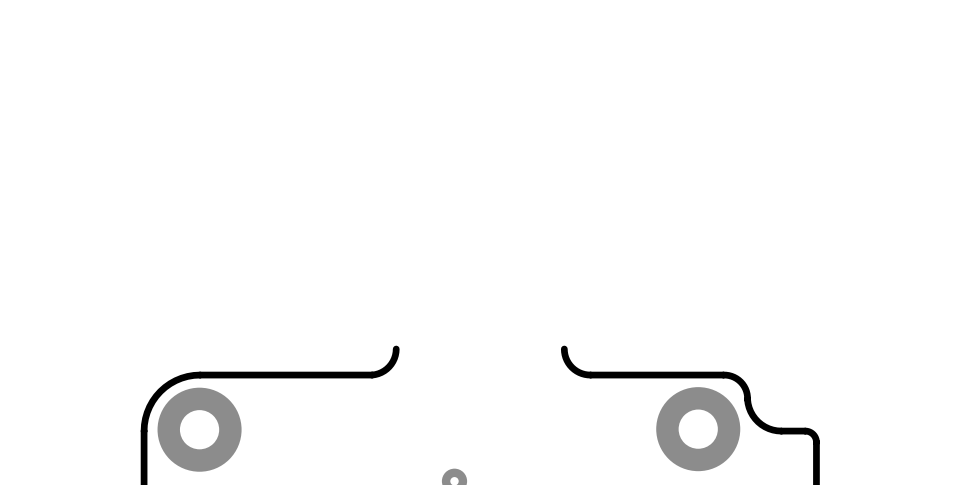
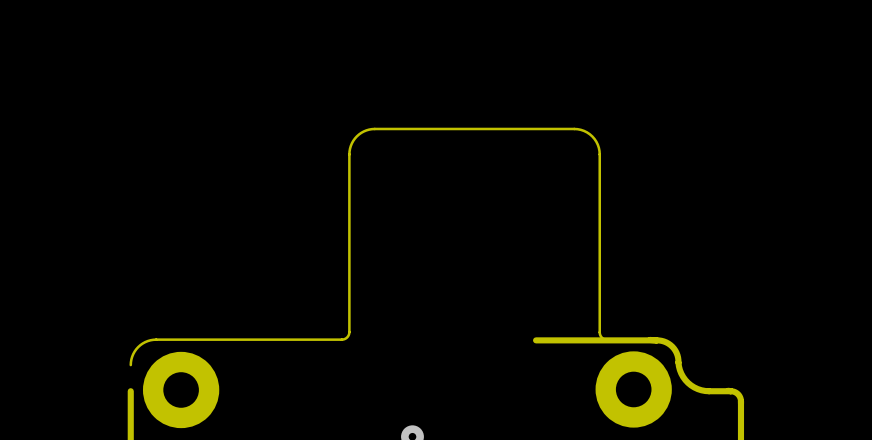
board edge: (396, 349) (394, 358) (389, 366) (381, 372) (372, 375) (200, 375) (181, 378) (165, 387) (156, 396) (147, 412) (144, 431) -> none
board edge: (564, 349) (565, 357) (572, 367) (579, 372) (590, 375) -> none
board edge: none -> (607, 339) (601, 337) (599, 333) (599, 154) (597, 144) (592, 136) (584, 130) (574, 128) (374, 128) (366, 130) (356, 136) (349, 151) (349, 332) (347, 337) (341, 339) (153, 339) (145, 342) (136, 349) (130, 365)

